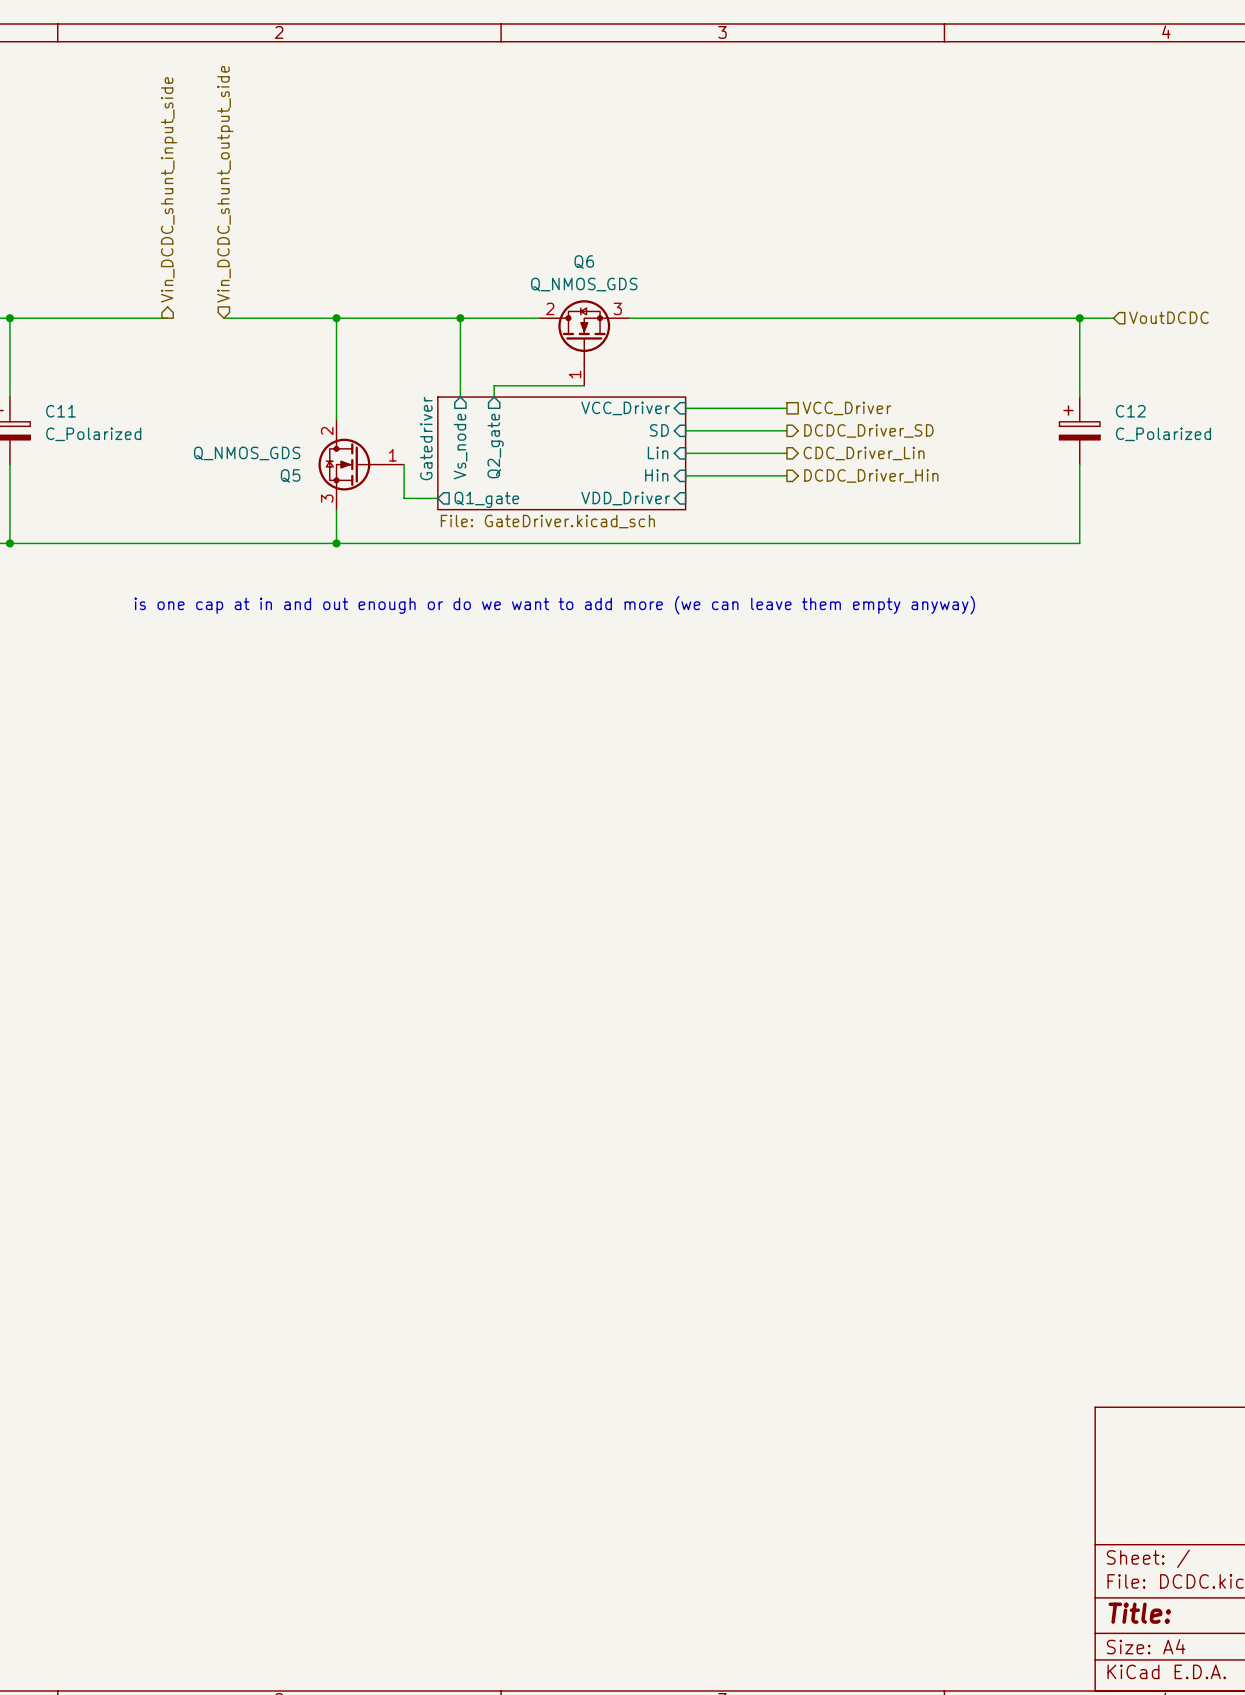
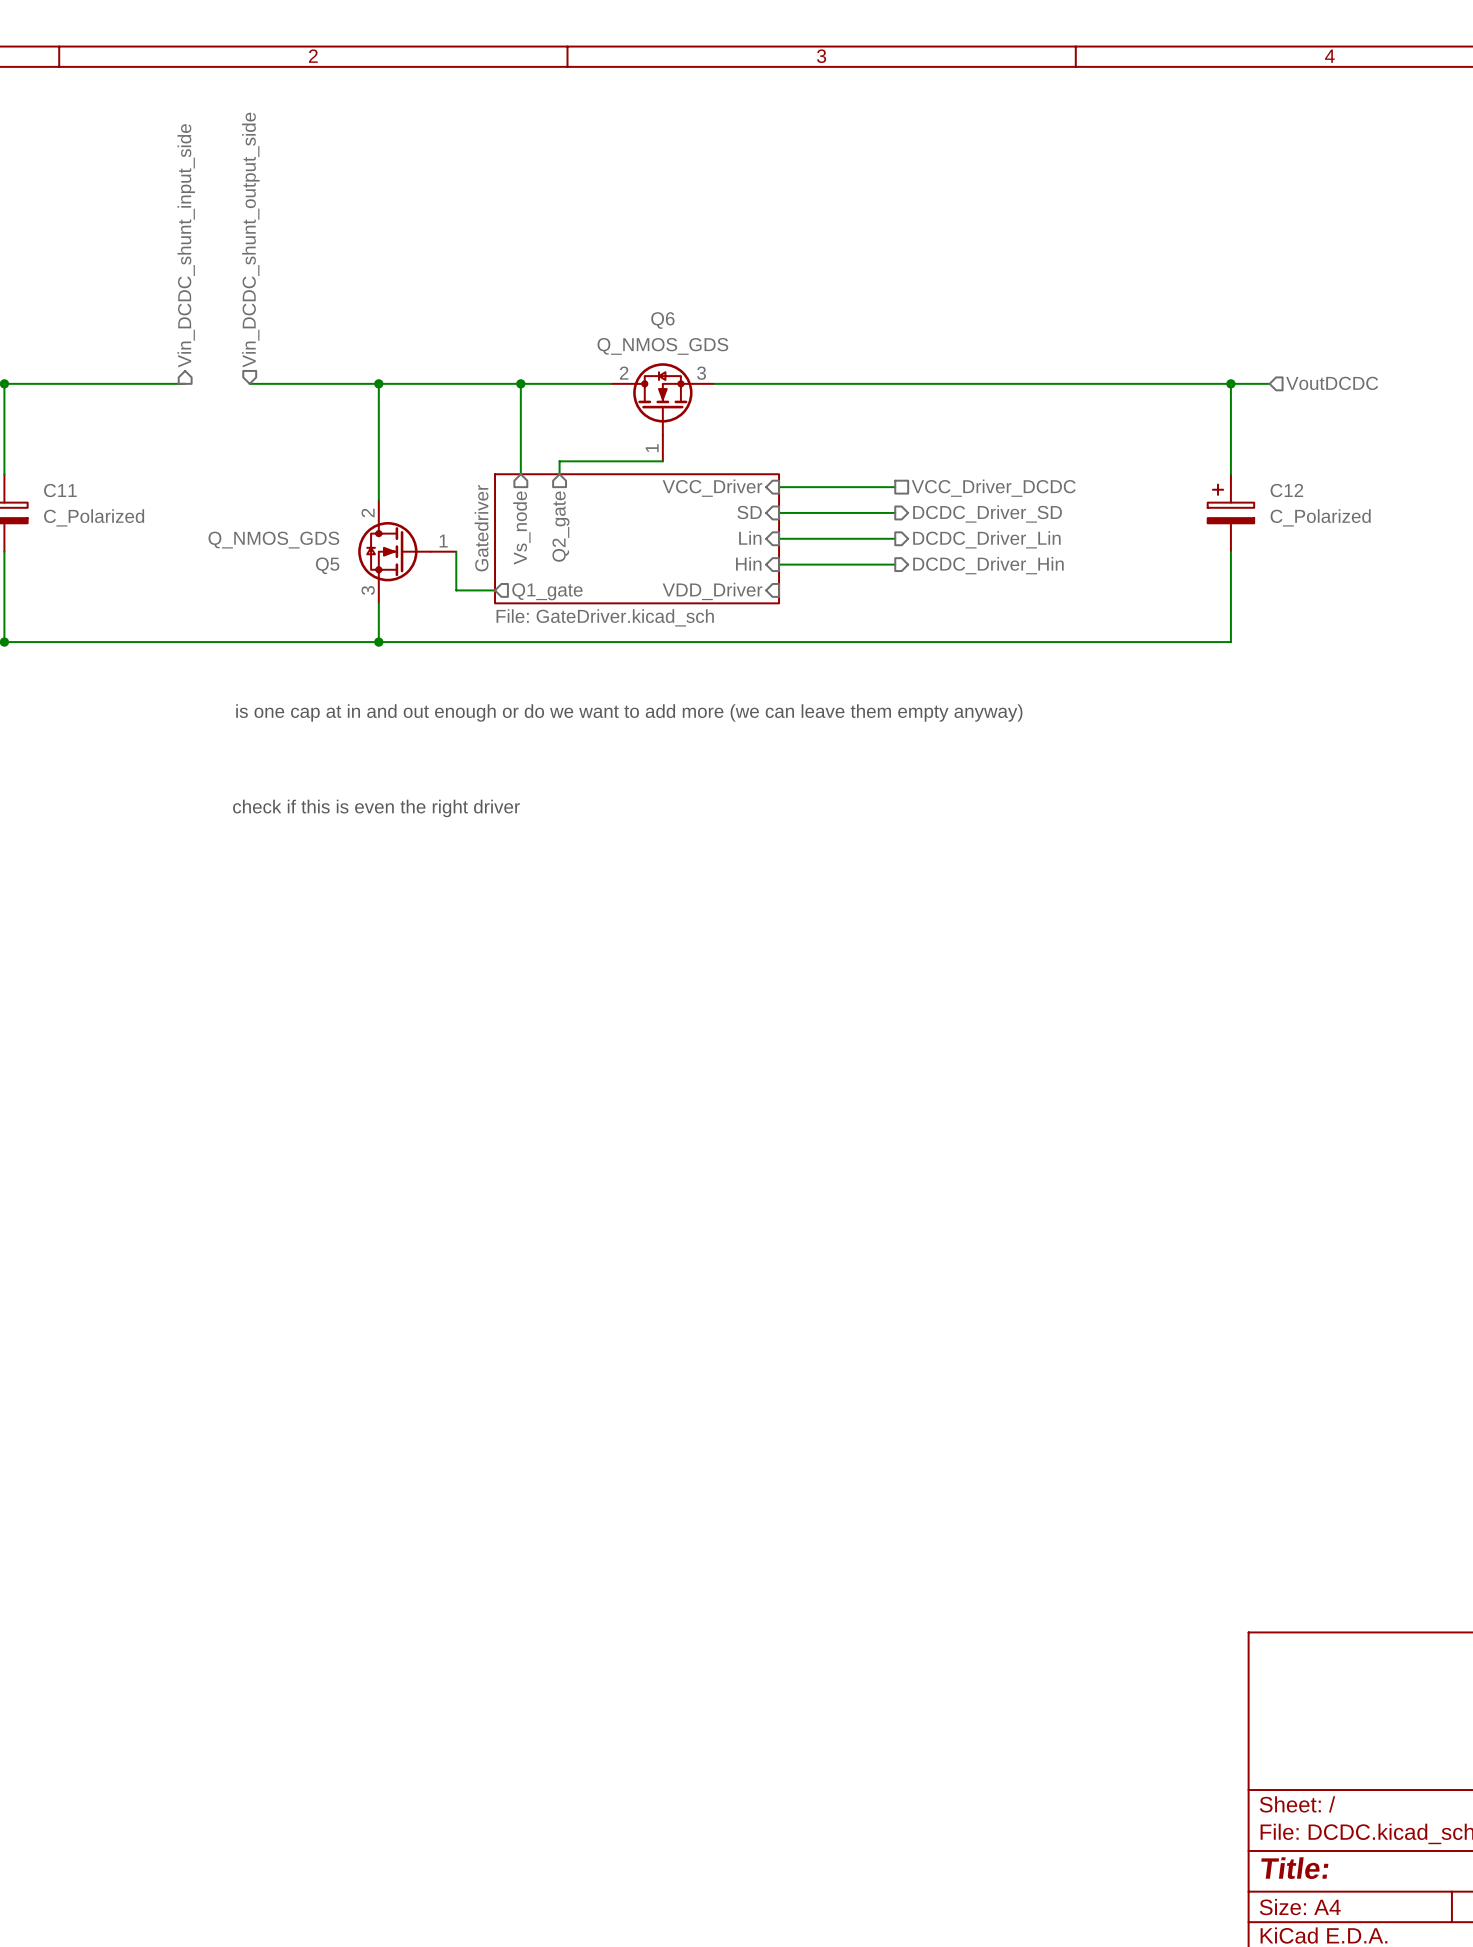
hierarchical label: VCC_Driver (846, 408) -> VCC_Driver_DCDC (993, 488)
hierarchical label: CDC_Driver_Lin (864, 453) -> DCDC_Driver_Lin (986, 539)
text: none -> check if this is even the right driver (376, 808)

